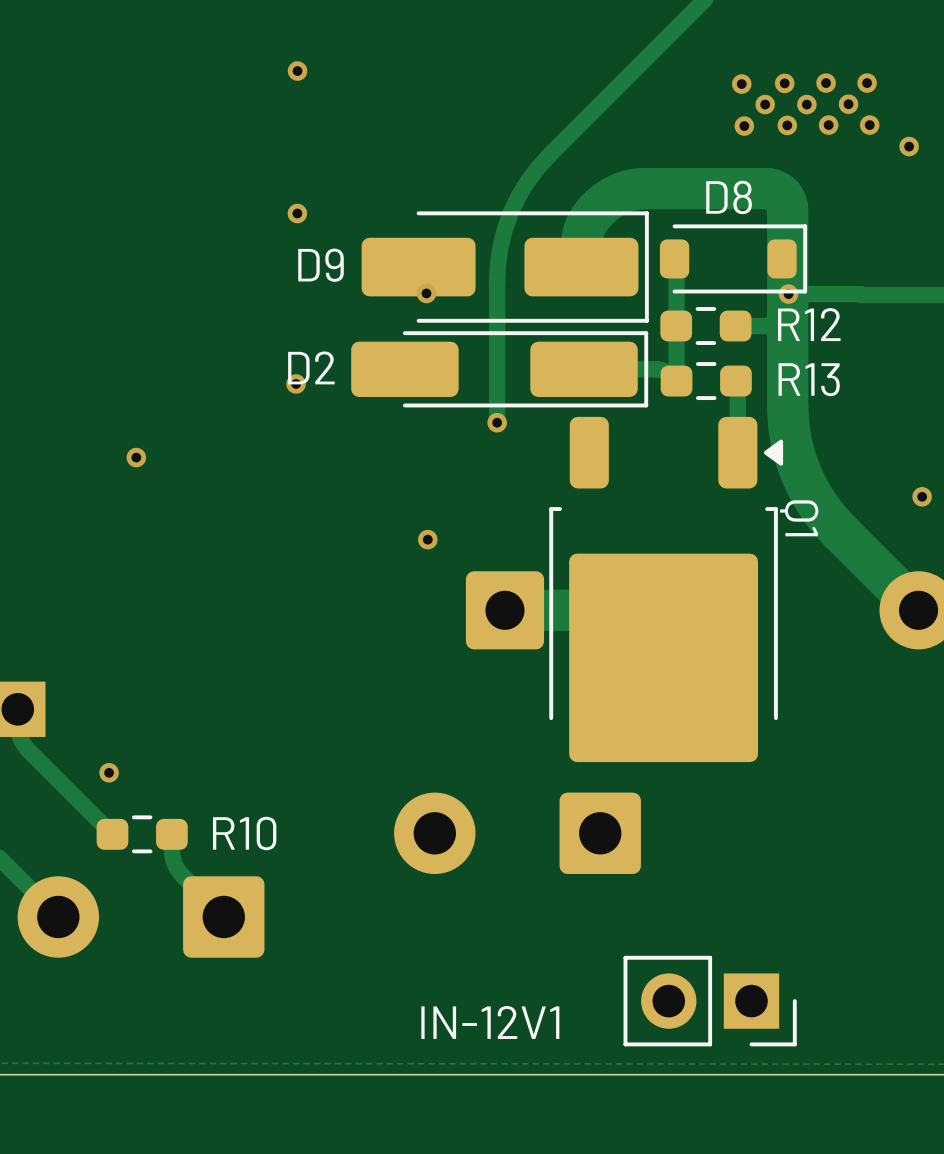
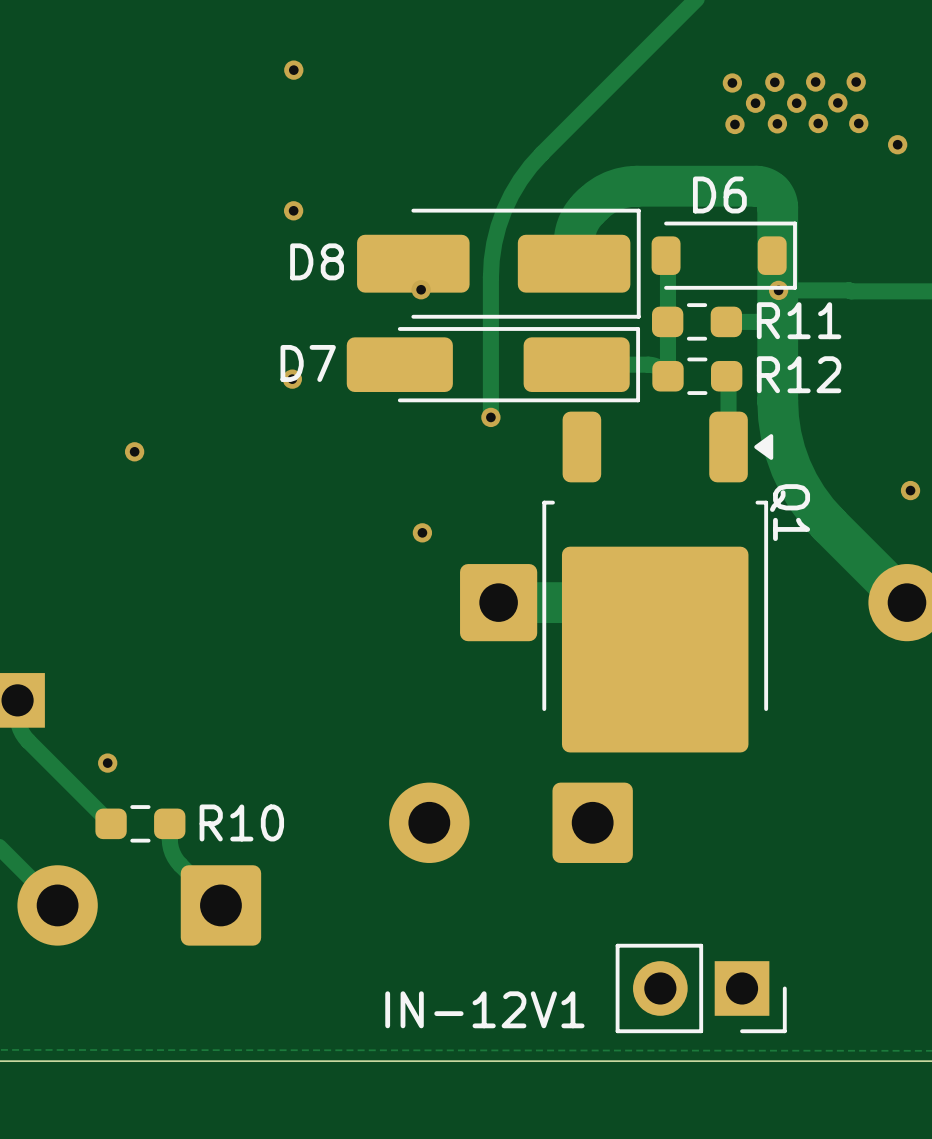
D8 name: D8 (729, 197) -> D6 (719, 194)
D9 name: D9 (321, 265) -> D8 (317, 261)
R12 name: R12 (809, 324) -> R11 (799, 320)
D2 name: D2 (311, 367) -> D7 (308, 363)
R13 name: R13 (809, 379) -> R12 (799, 374)

